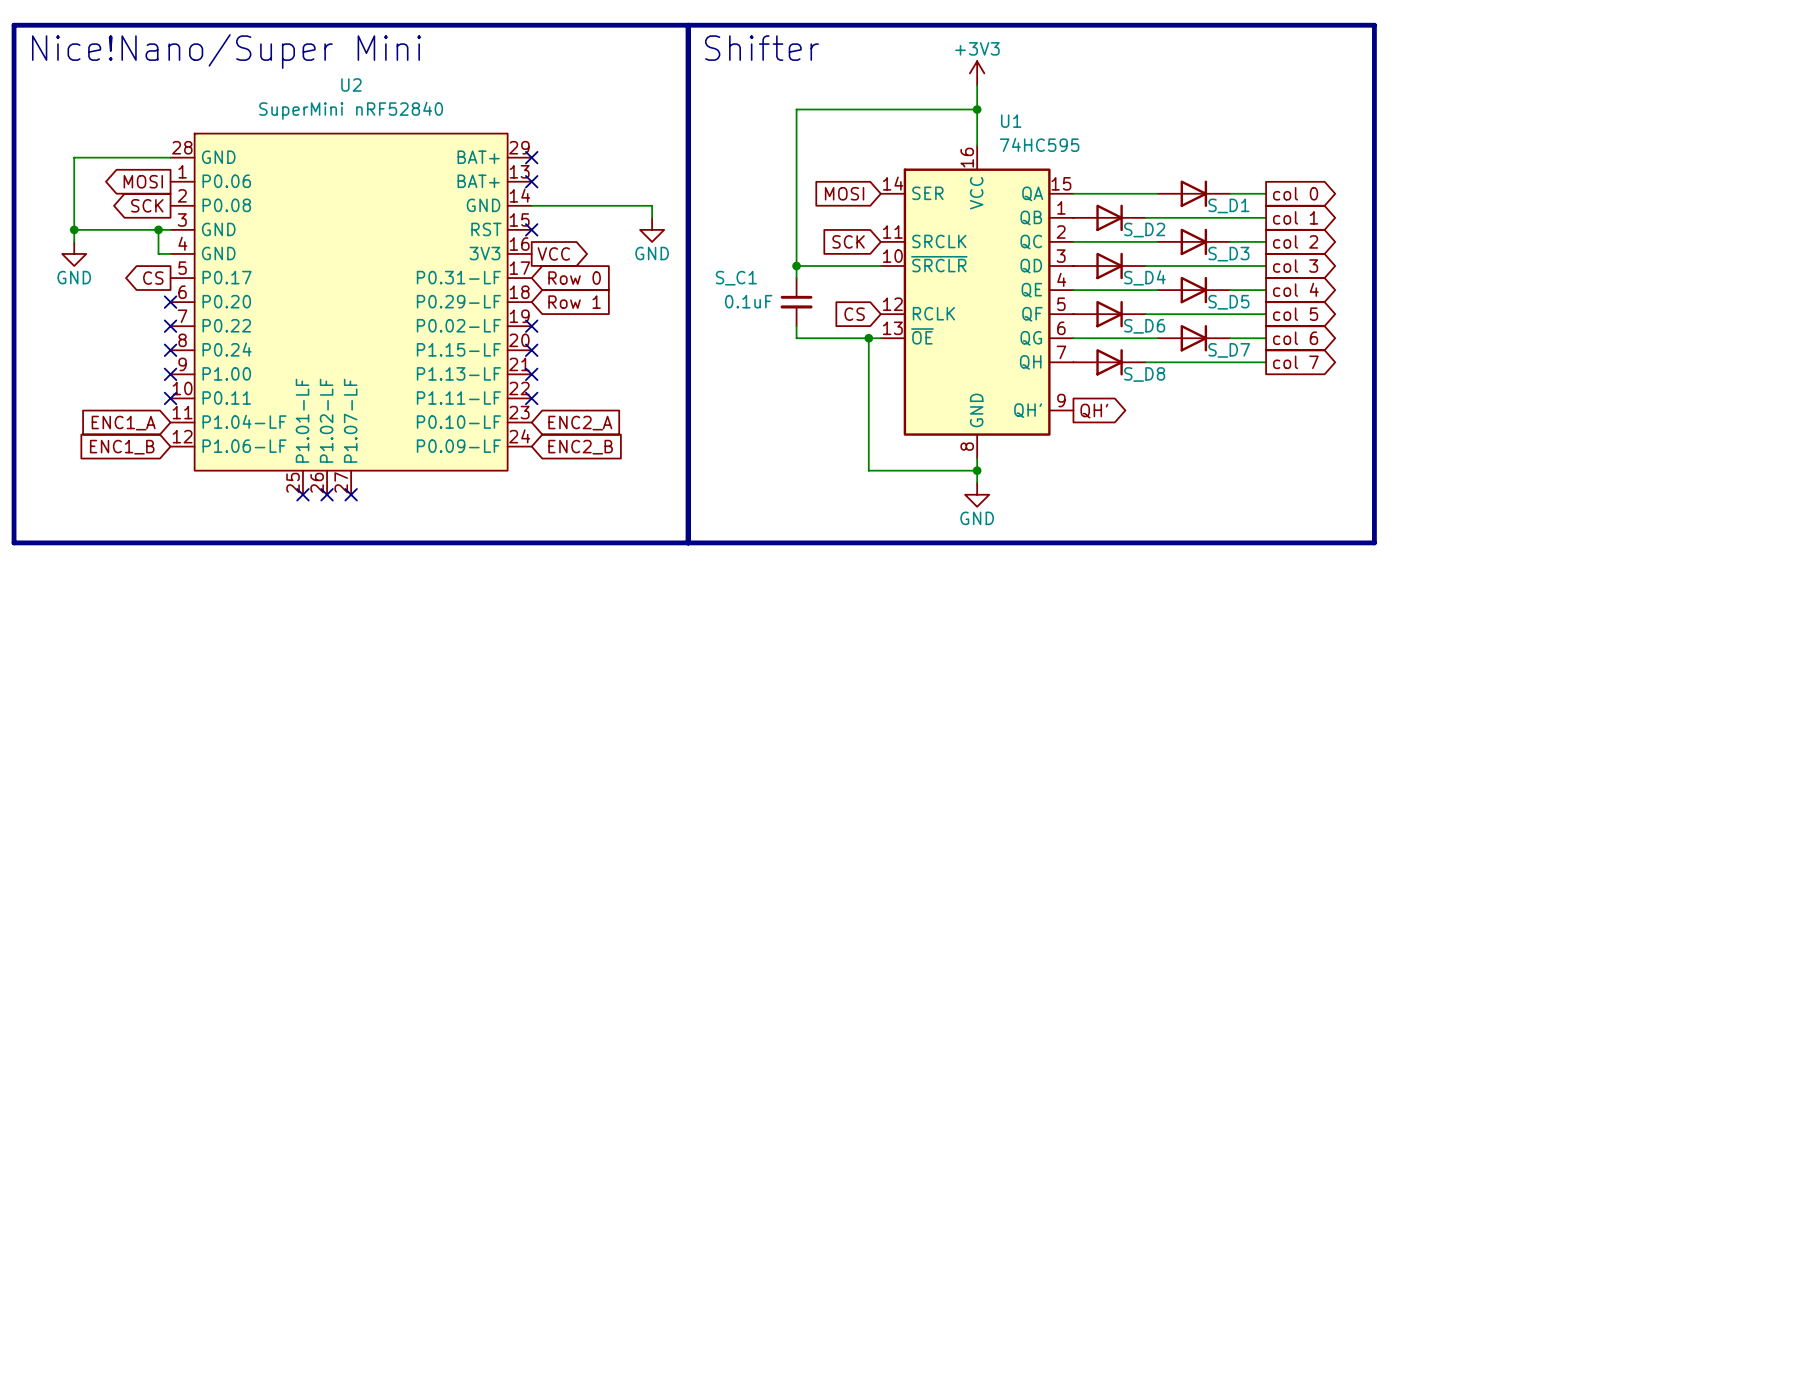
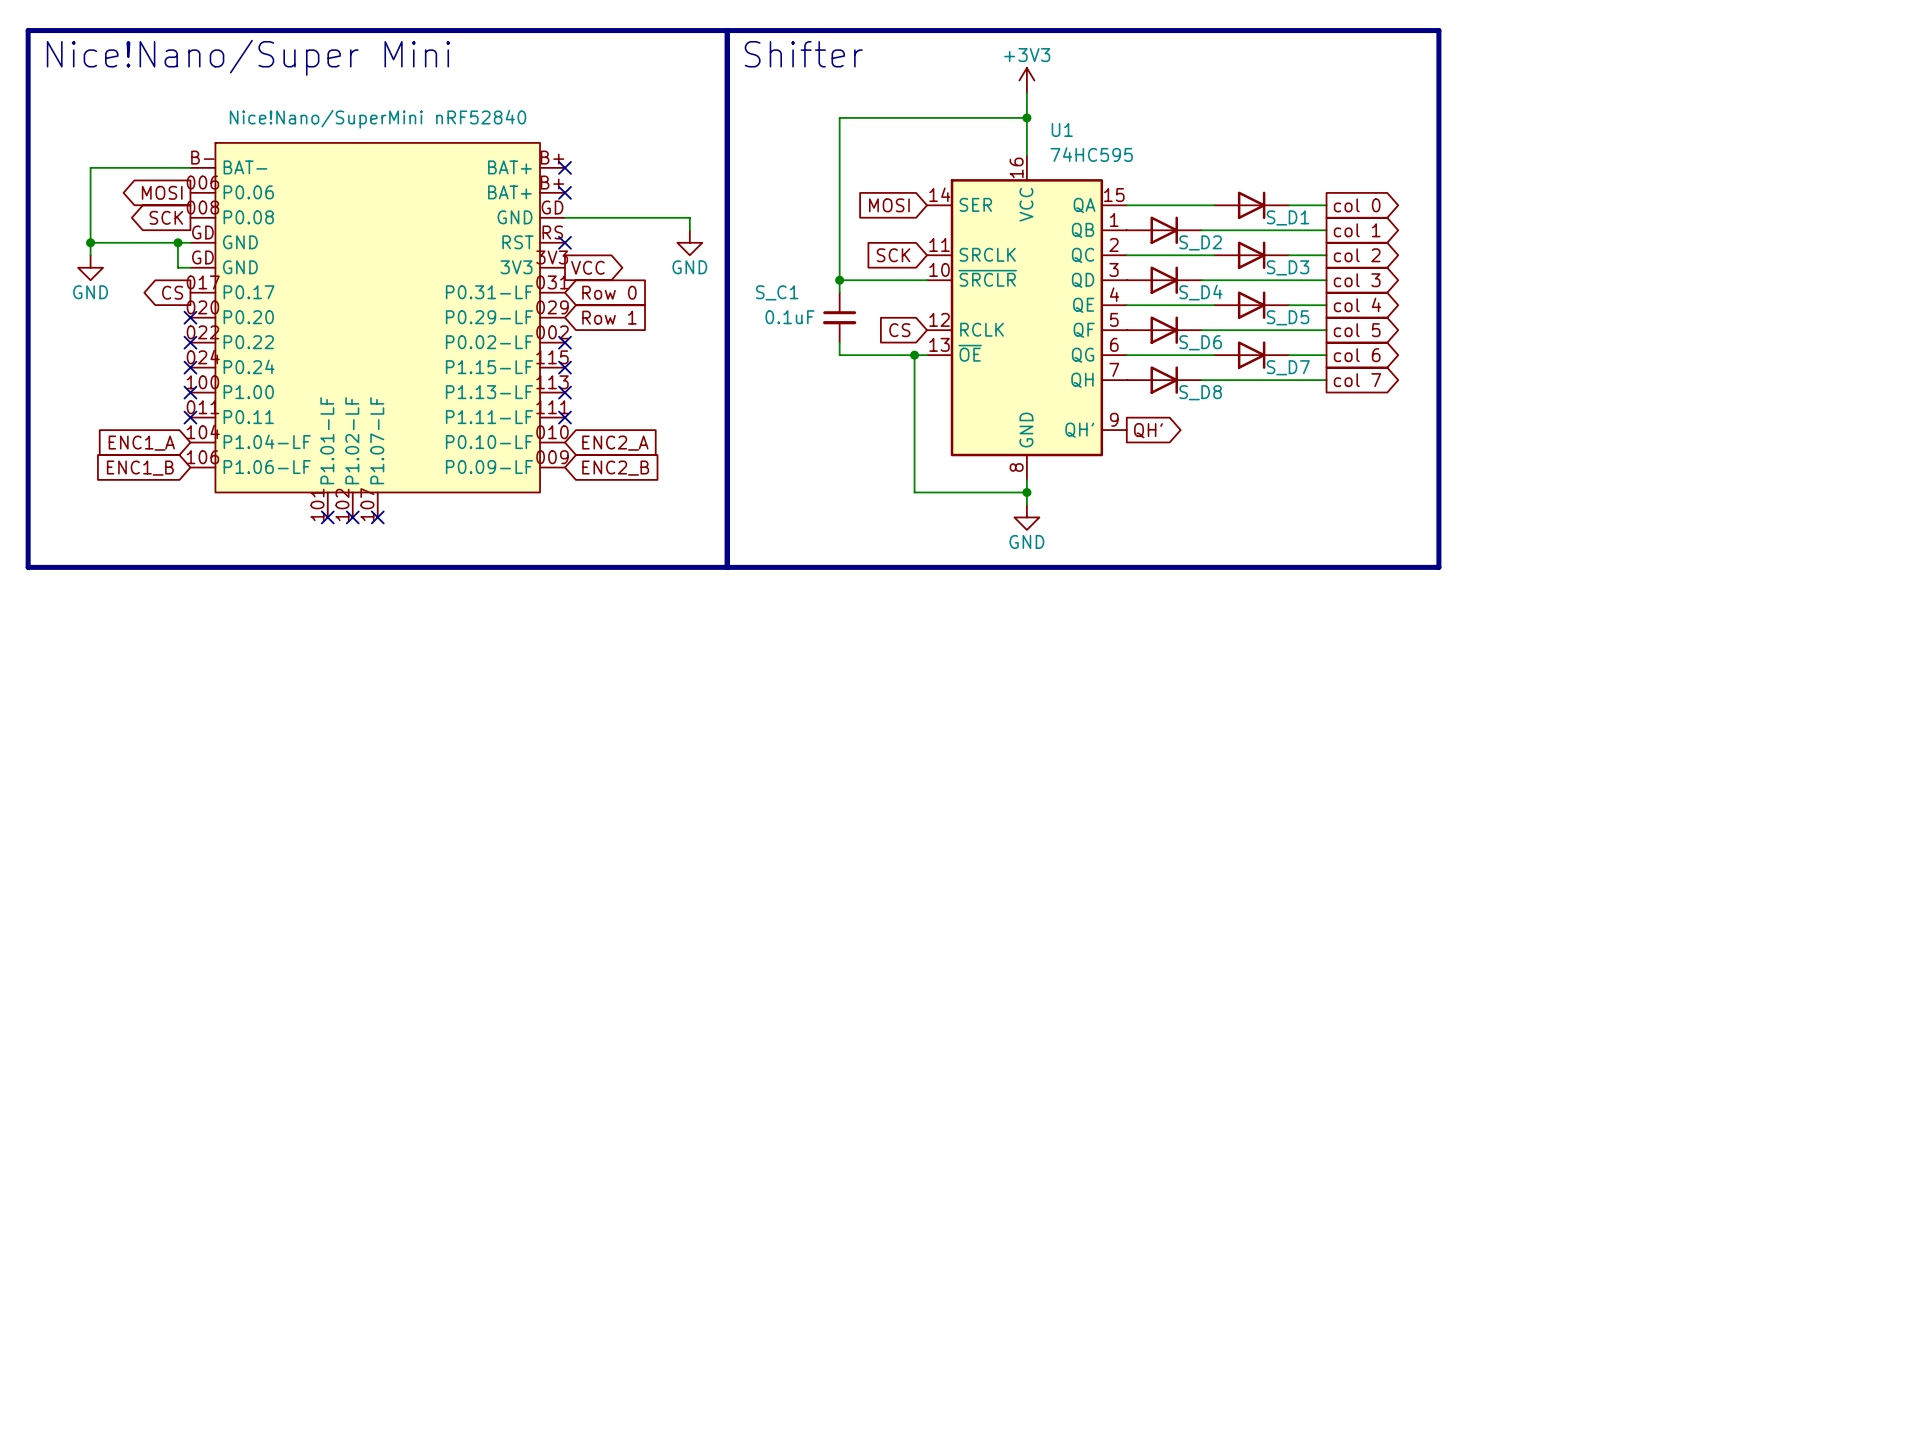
U2 name: U2 (351, 84) -> none
U2 value: SuperMini nRF52840 (351, 110) -> Nice!Nano/SuperMini nRF52840 (378, 119)
U2 symbol: [170, 133, 532, 495] -> [190, 142, 565, 518]

